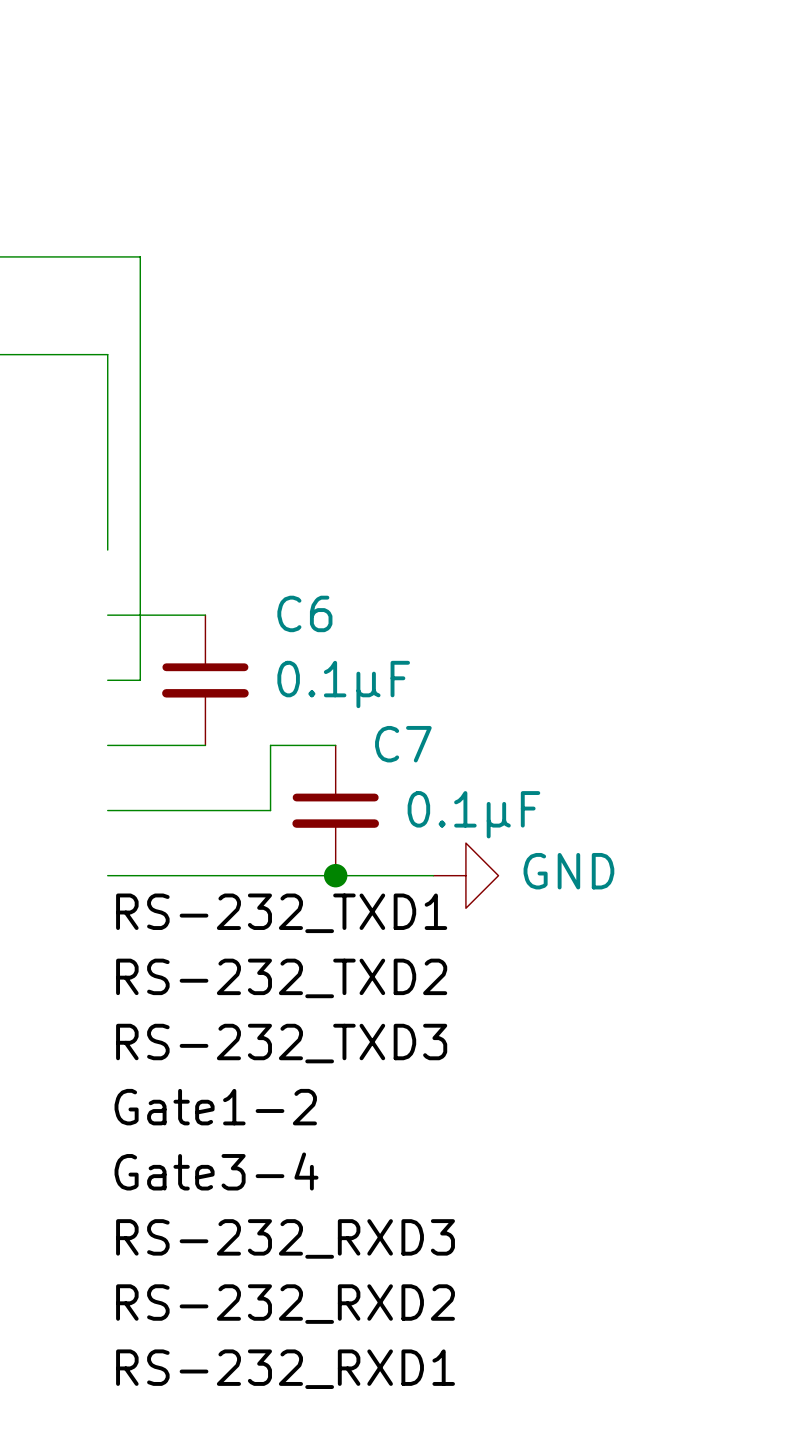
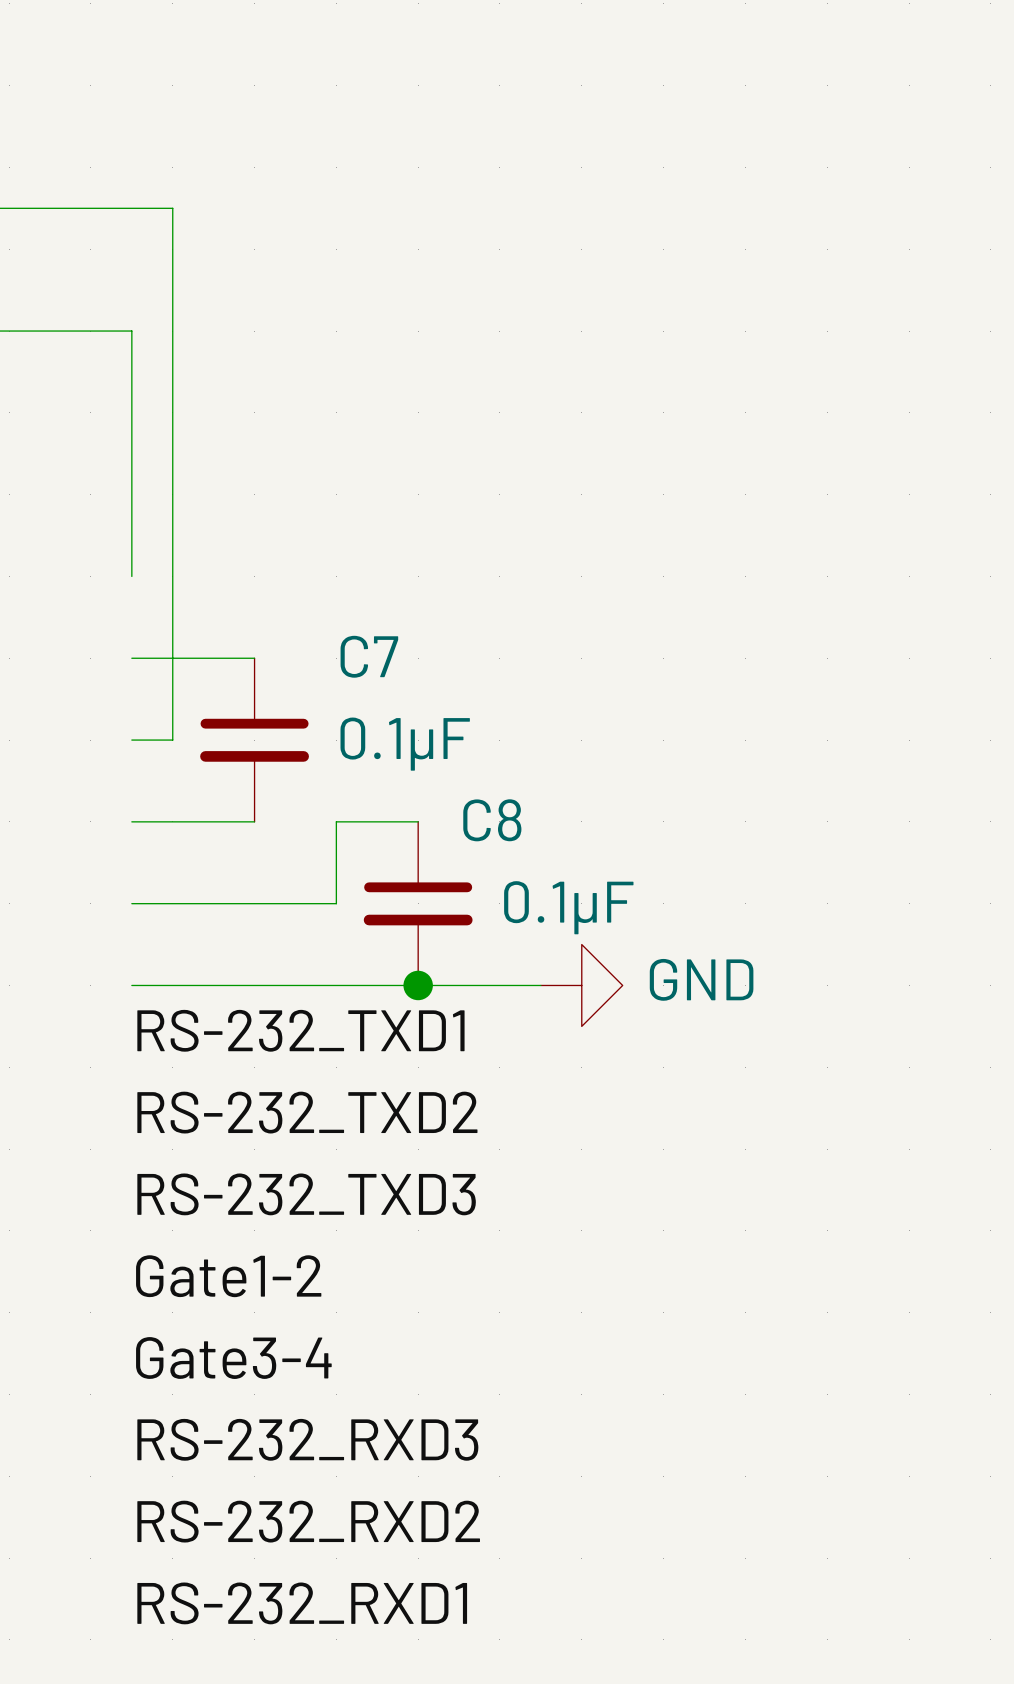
C6 name: C6 (304, 613) -> C7 (369, 656)
C7 name: C7 (403, 744) -> C8 (492, 820)

